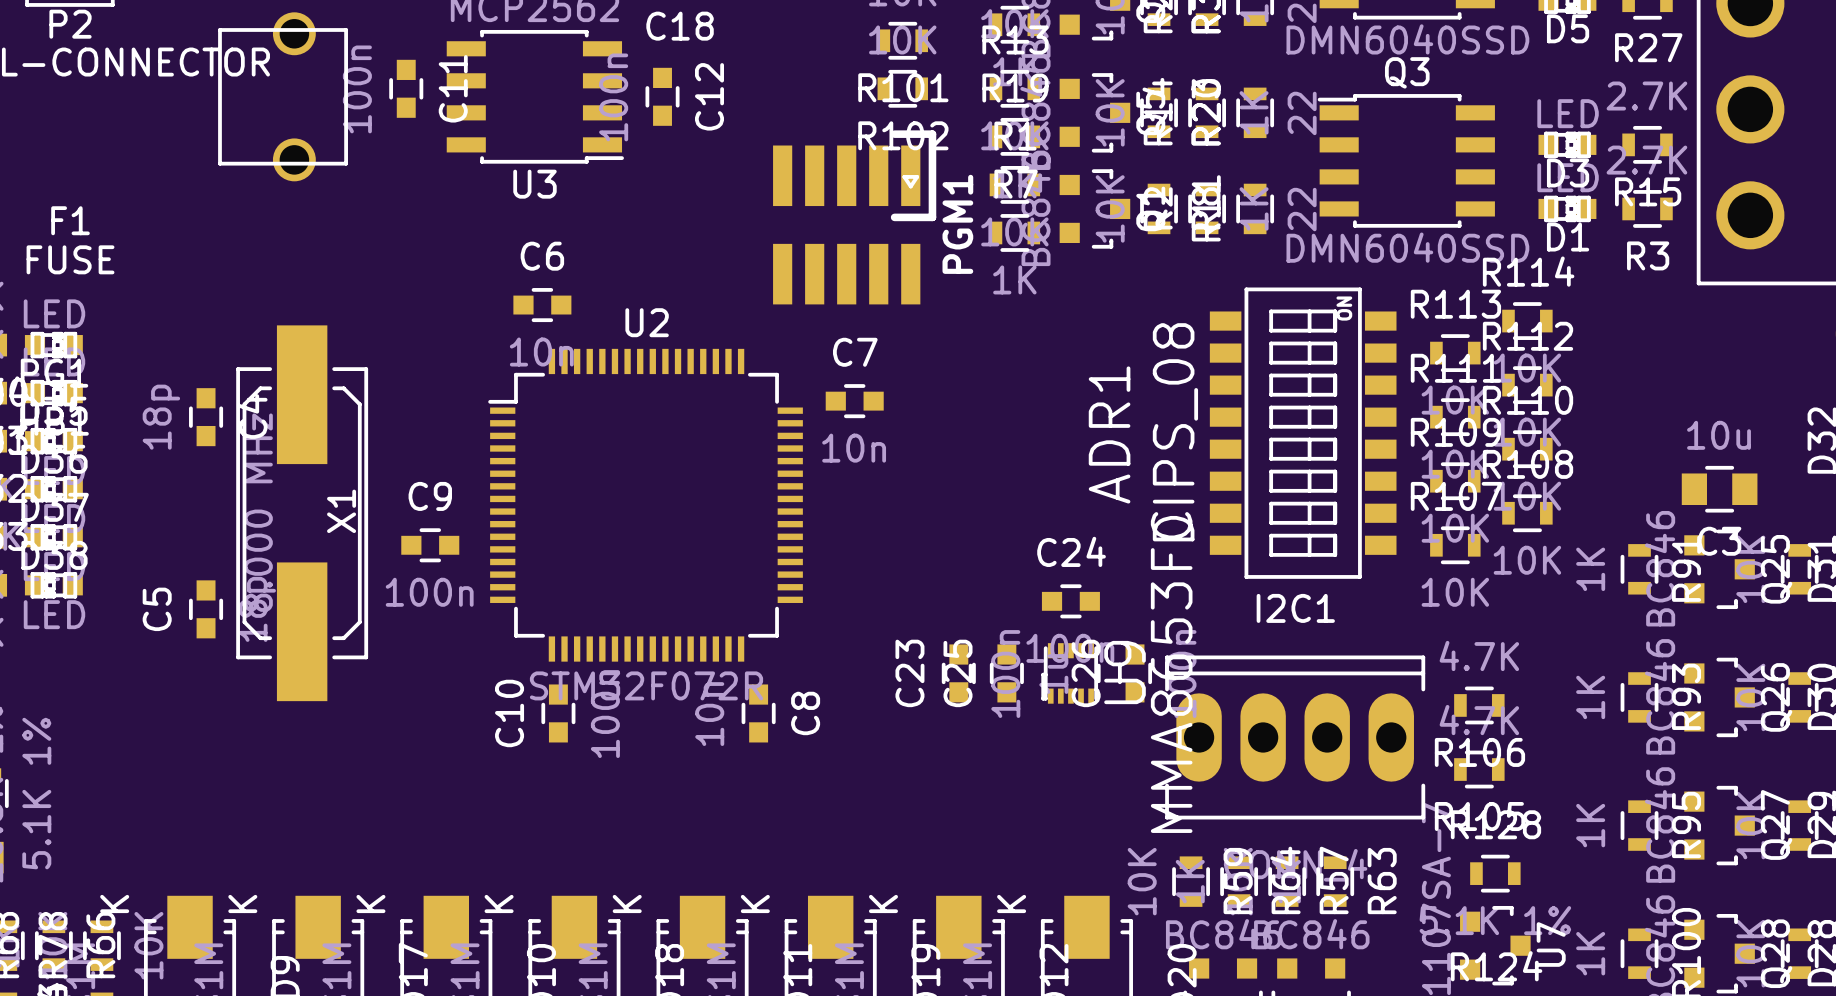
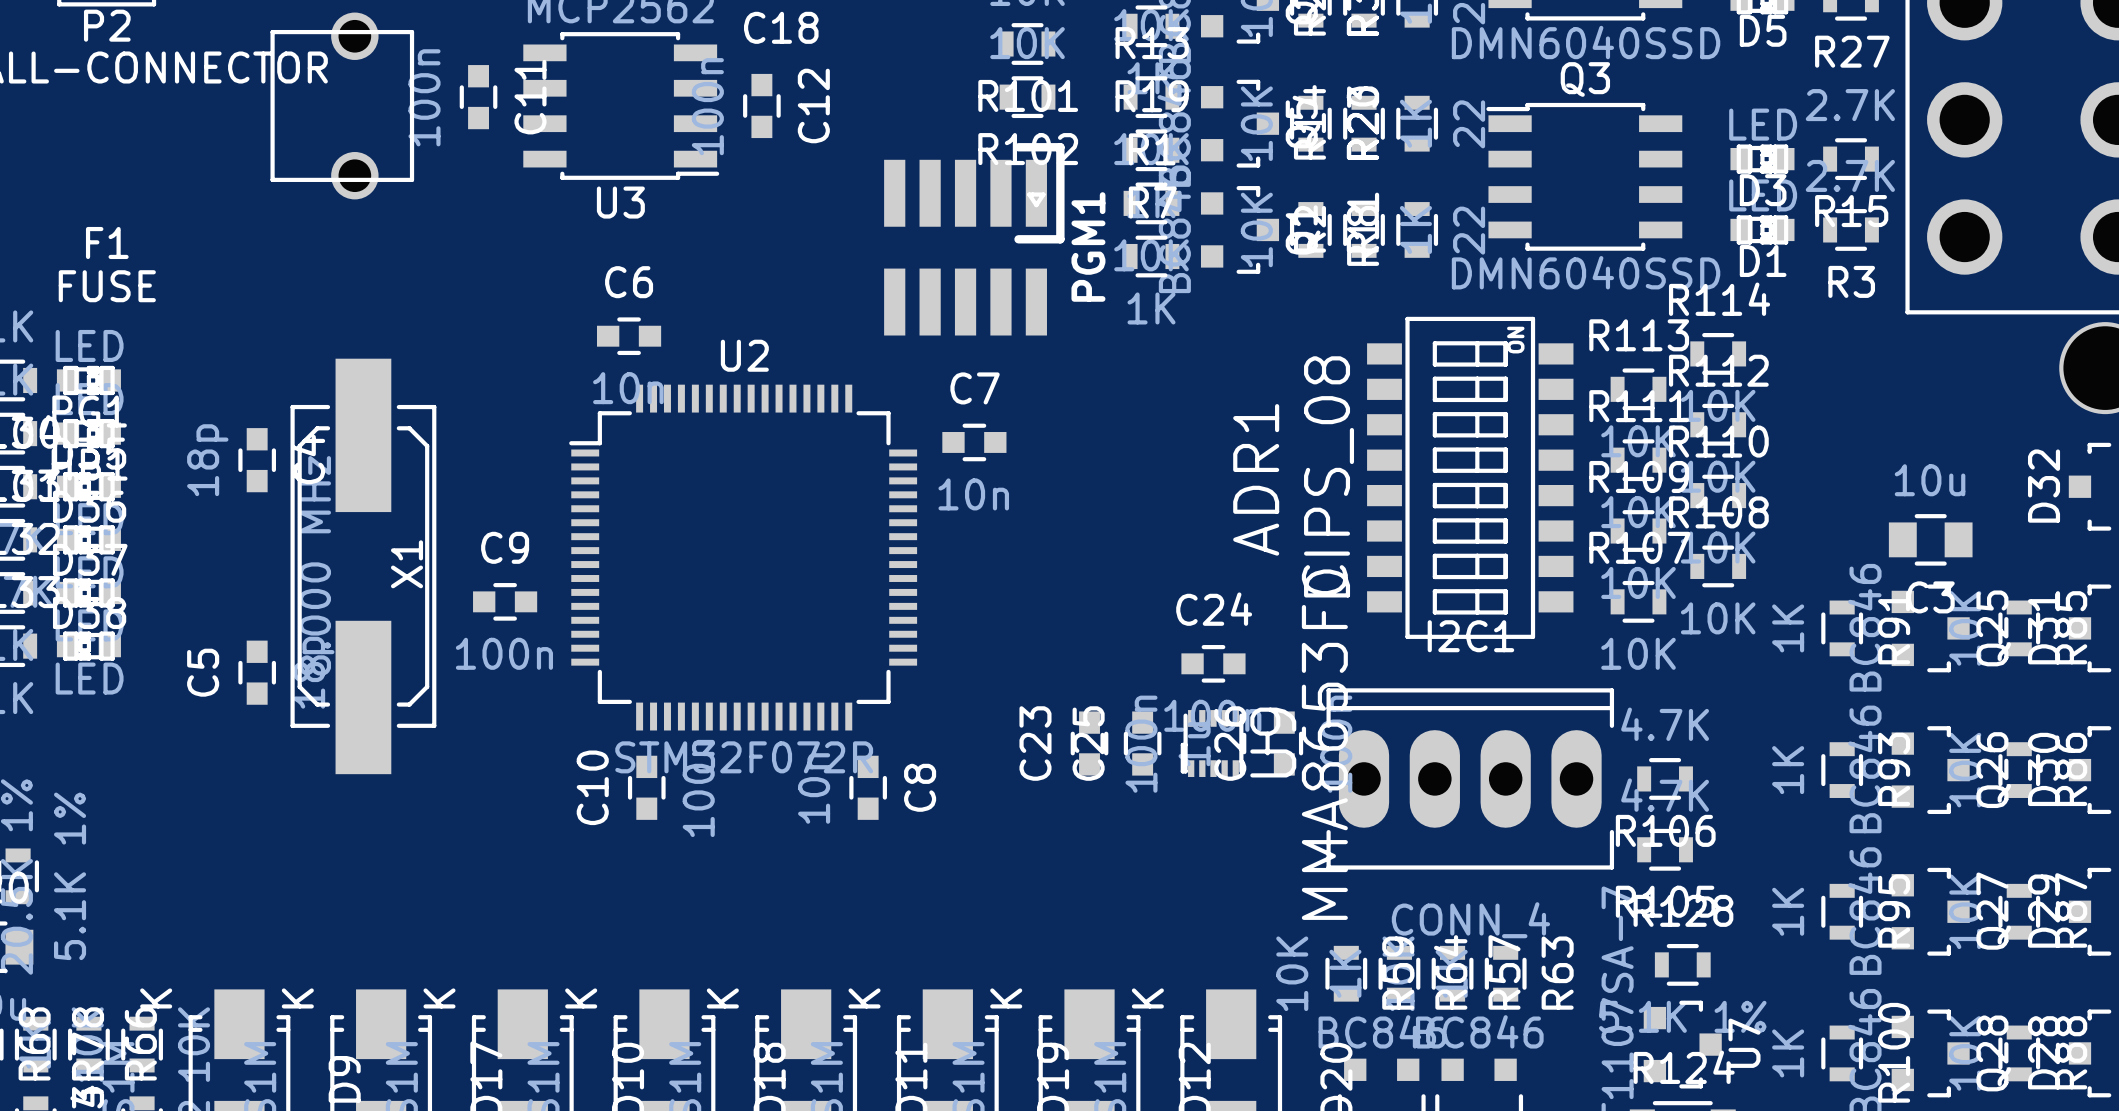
I2C1 position: (1295, 737) -> (1470, 778)

